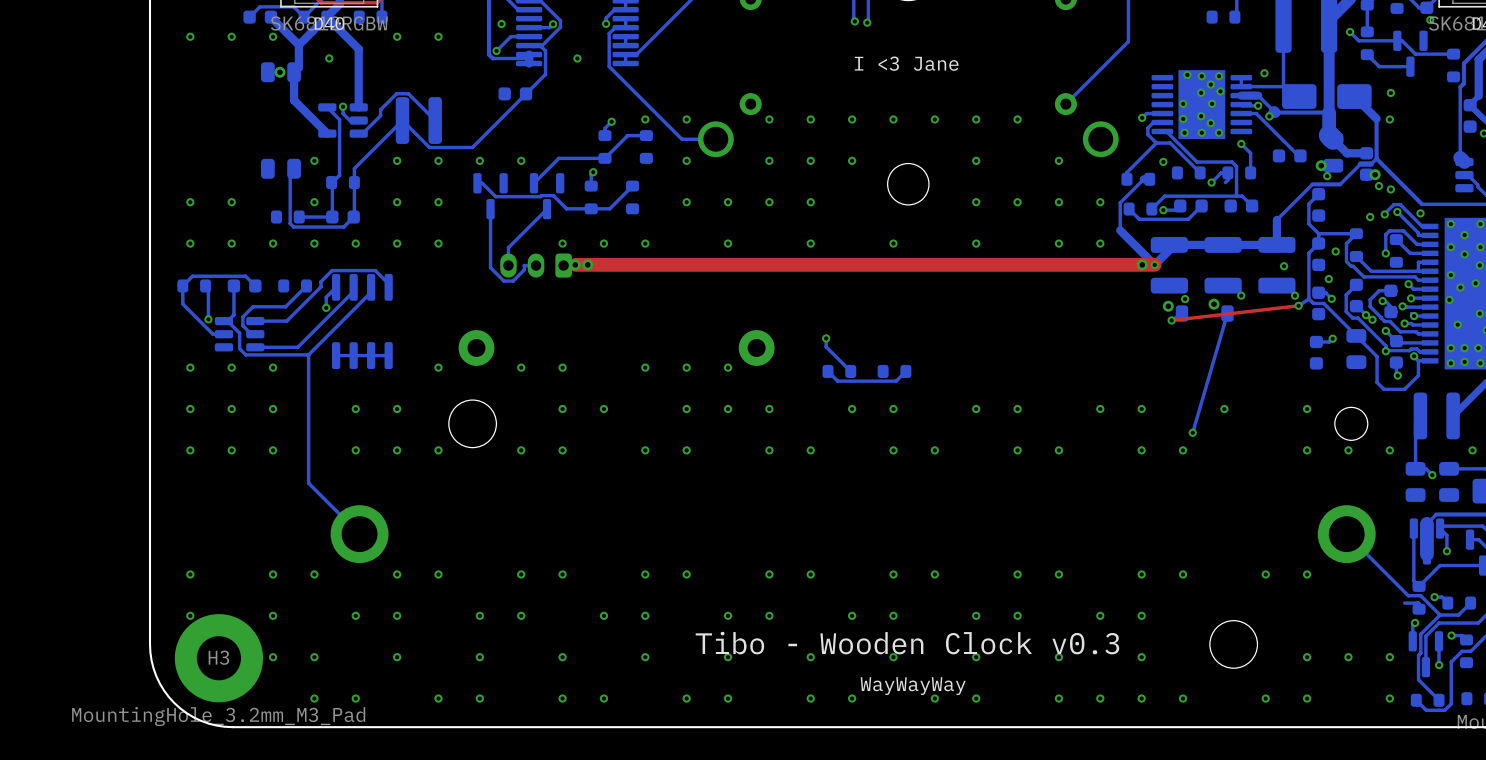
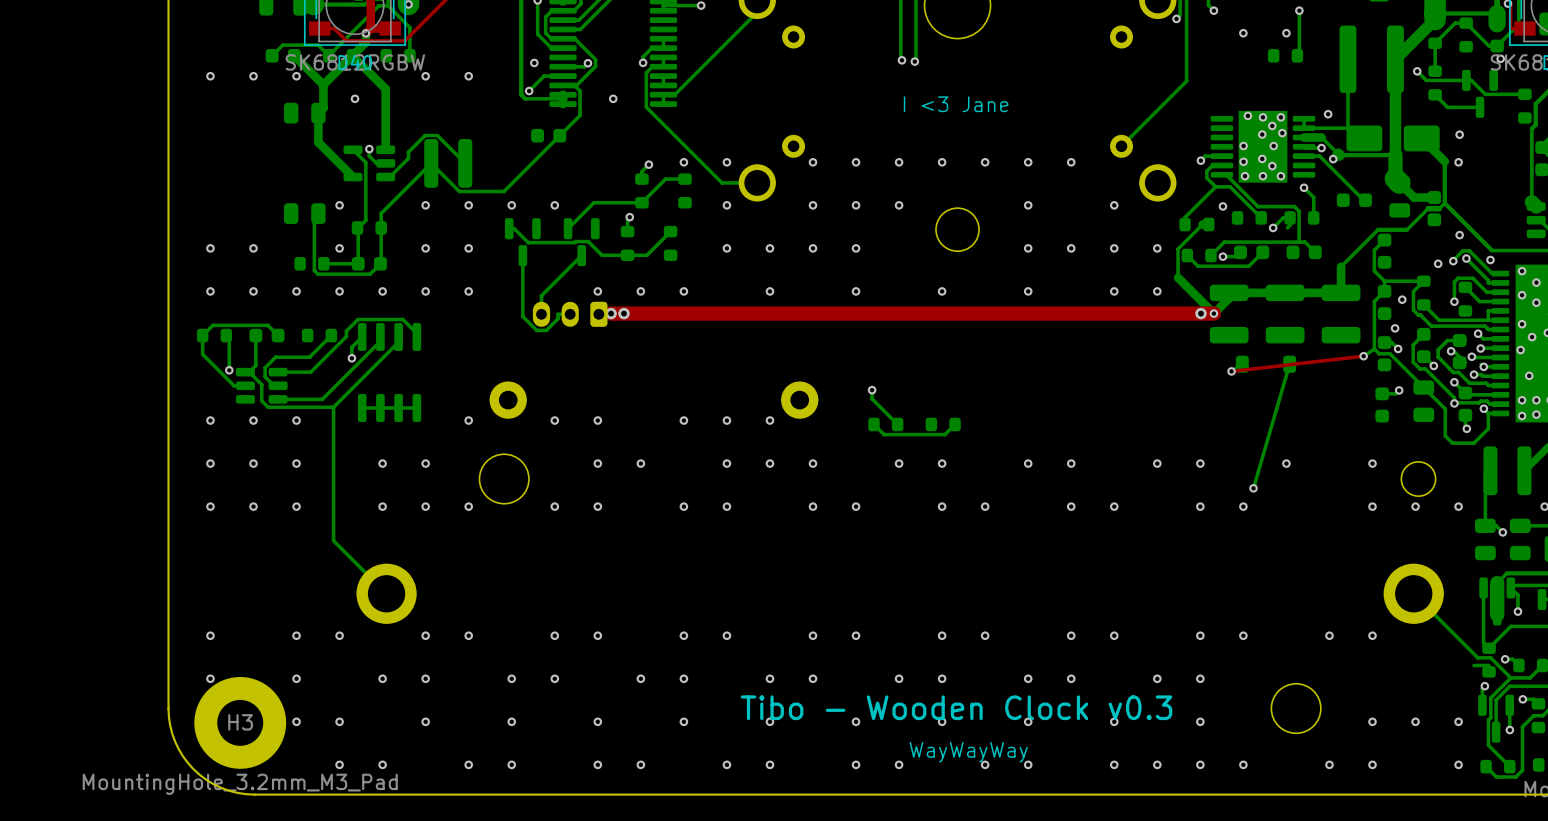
via: (279, 72) -> none
via: (1321, 165) -> none
via: (1375, 174) -> none
via: (1327, 176) -> none
via: (1378, 186) -> none
via: (1284, 266) -> none
via: (1241, 295) -> none
via: (1294, 295) -> none
via: (1185, 299) -> none
via: (1214, 304) -> none
via: (1168, 306) -> none
via: (1372, 319) -> none

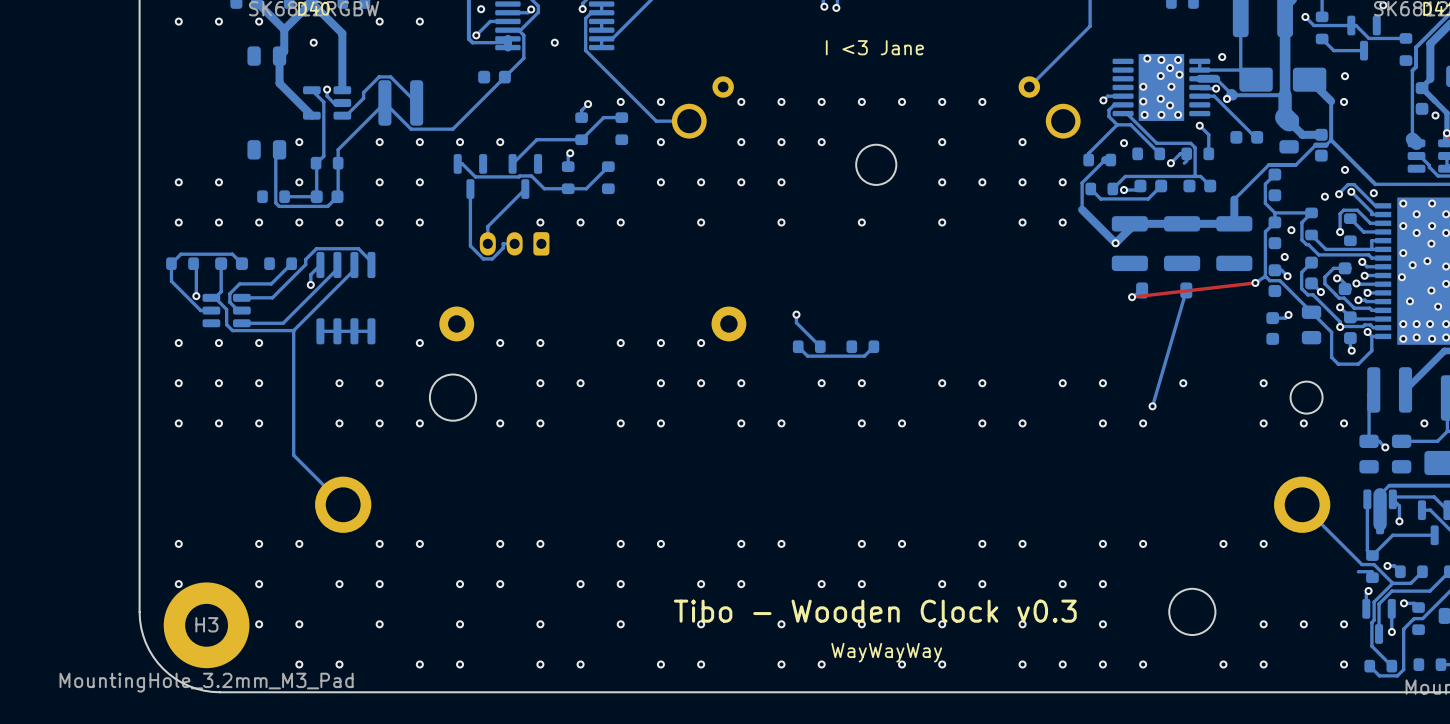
top track: (611, 313) (1213, 313) -> none
via: (611, 313) -> none
via: (623, 313) -> none
via: (1200, 313) -> none

